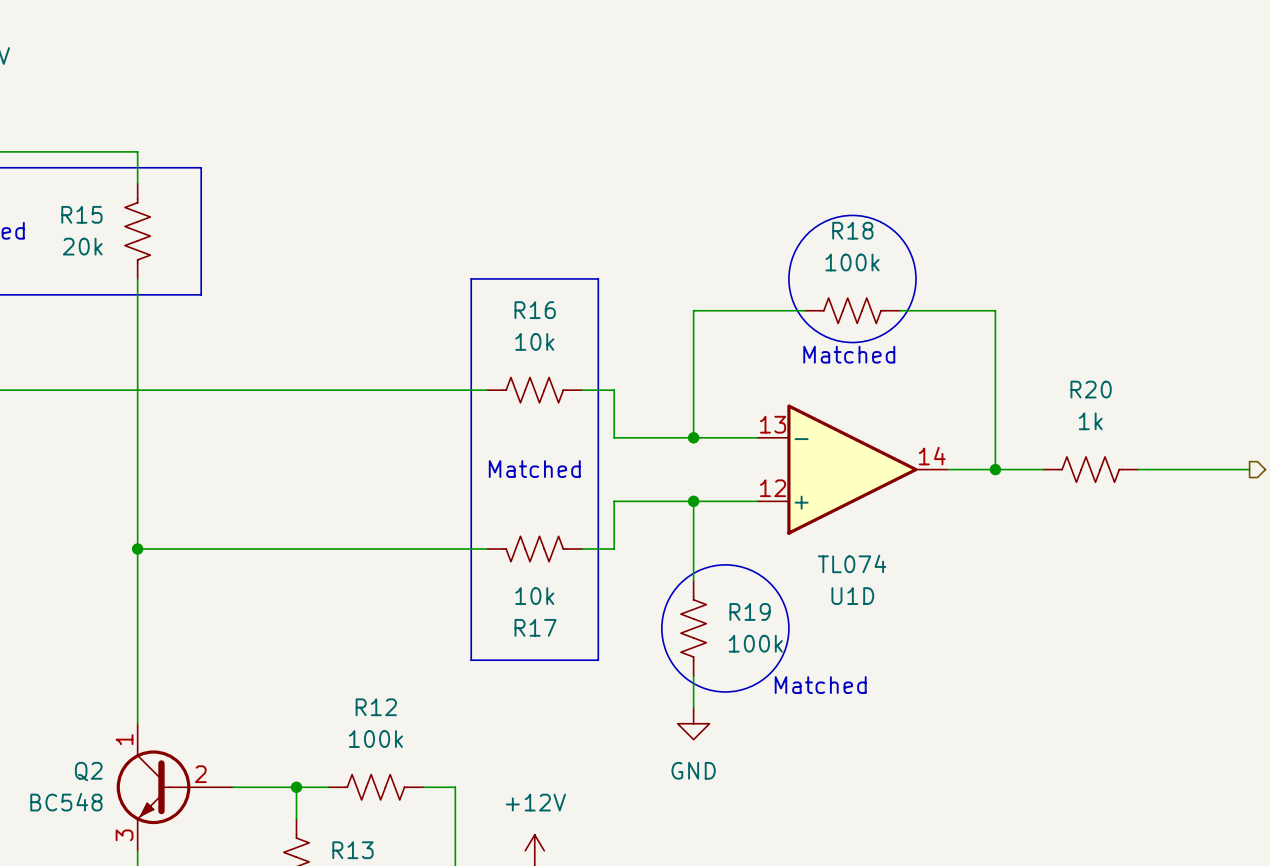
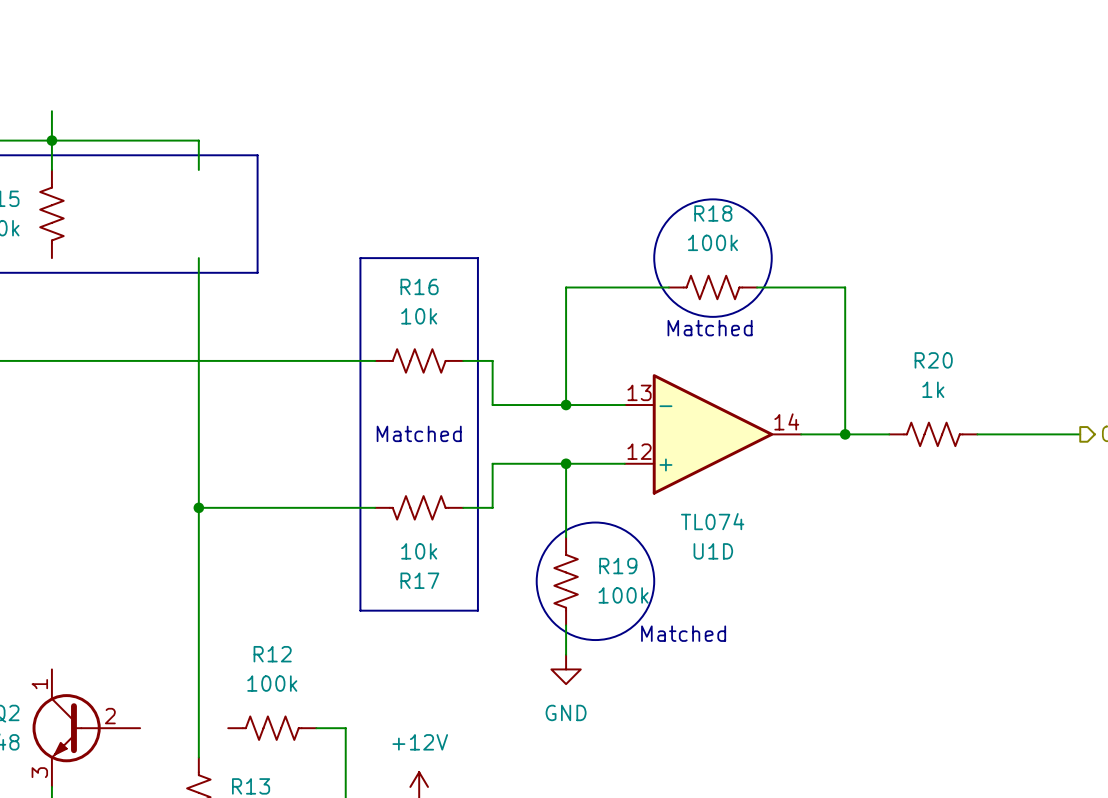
wire: none -> (51, 111) (51, 140) (198, 140) (198, 169)
junction: none -> (51, 140)
line: (201, 167) (201, 294) -> (110, 155) (257, 155) (257, 272) (110, 272)
wire: (137, 278) (137, 723) -> none
wire: none -> (198, 258) (198, 728)
wire: (137, 549) (296, 549) -> none
junction: (137, 549) -> none
junction: none -> (198, 507)
wire: (232, 787) (328, 787) -> none
junction: (296, 787) -> none

